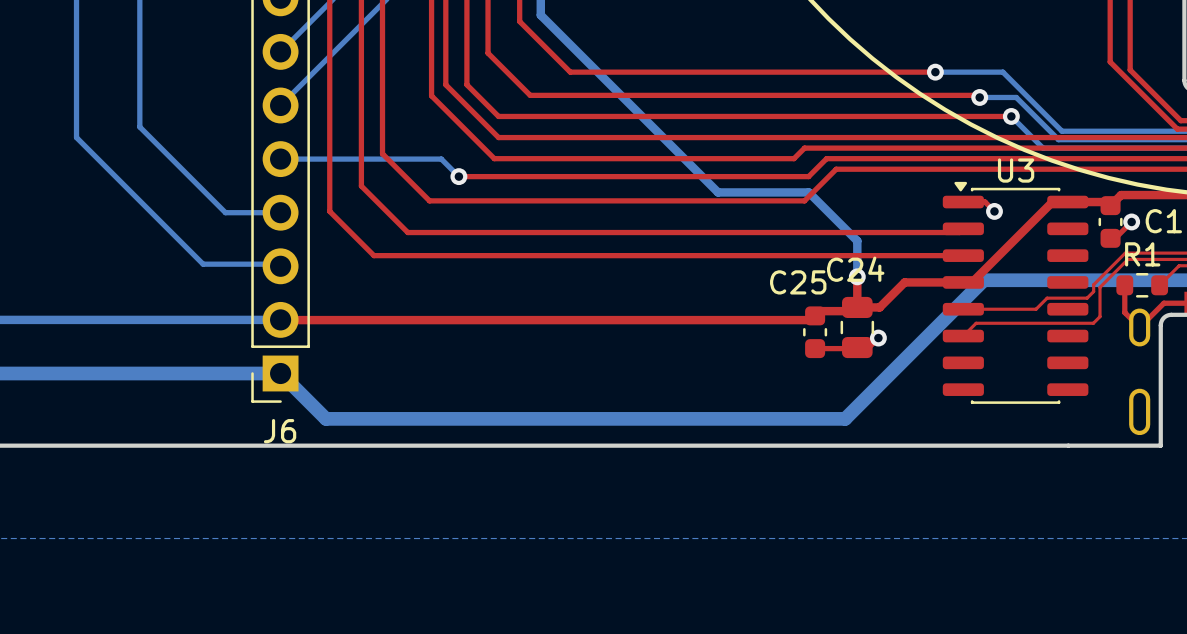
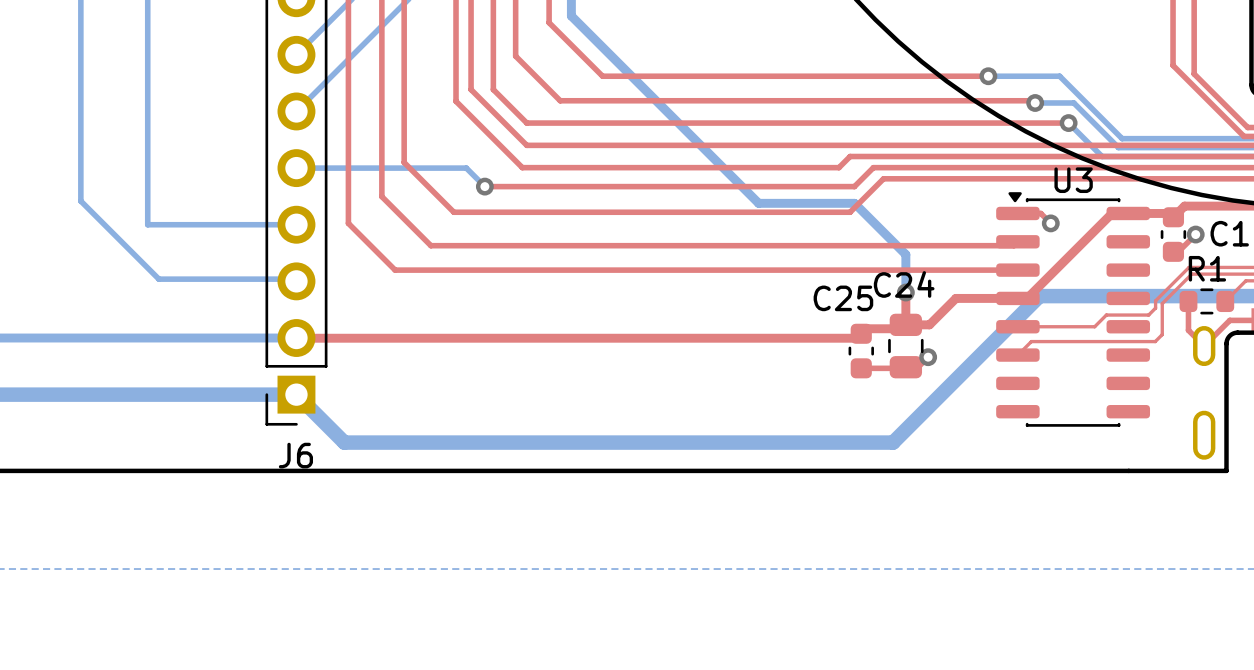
bottom track: (139, 127) (225, 212) -> (147, 134) (147, 224) (238, 224)
bottom track: (76, 137) (203, 264) -> (80, 145) (80, 201) (158, 279) (214, 279)

